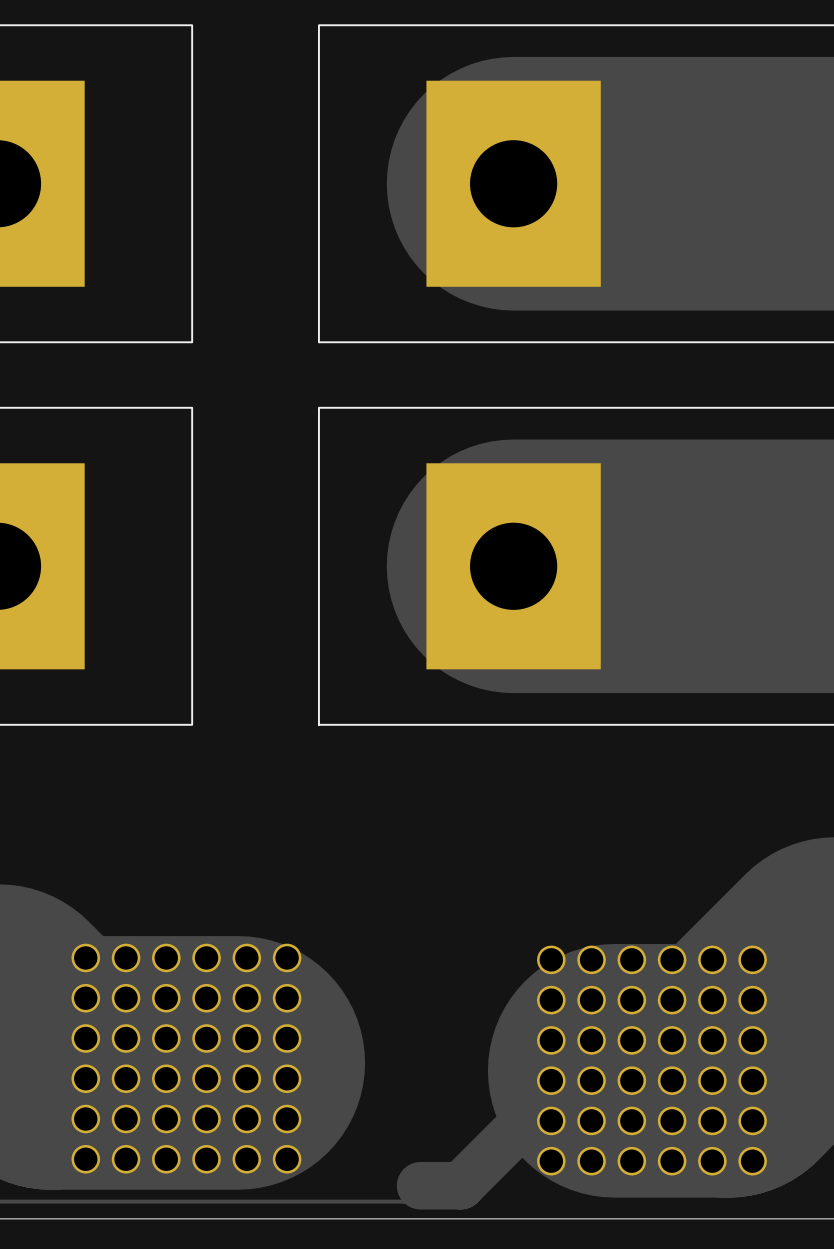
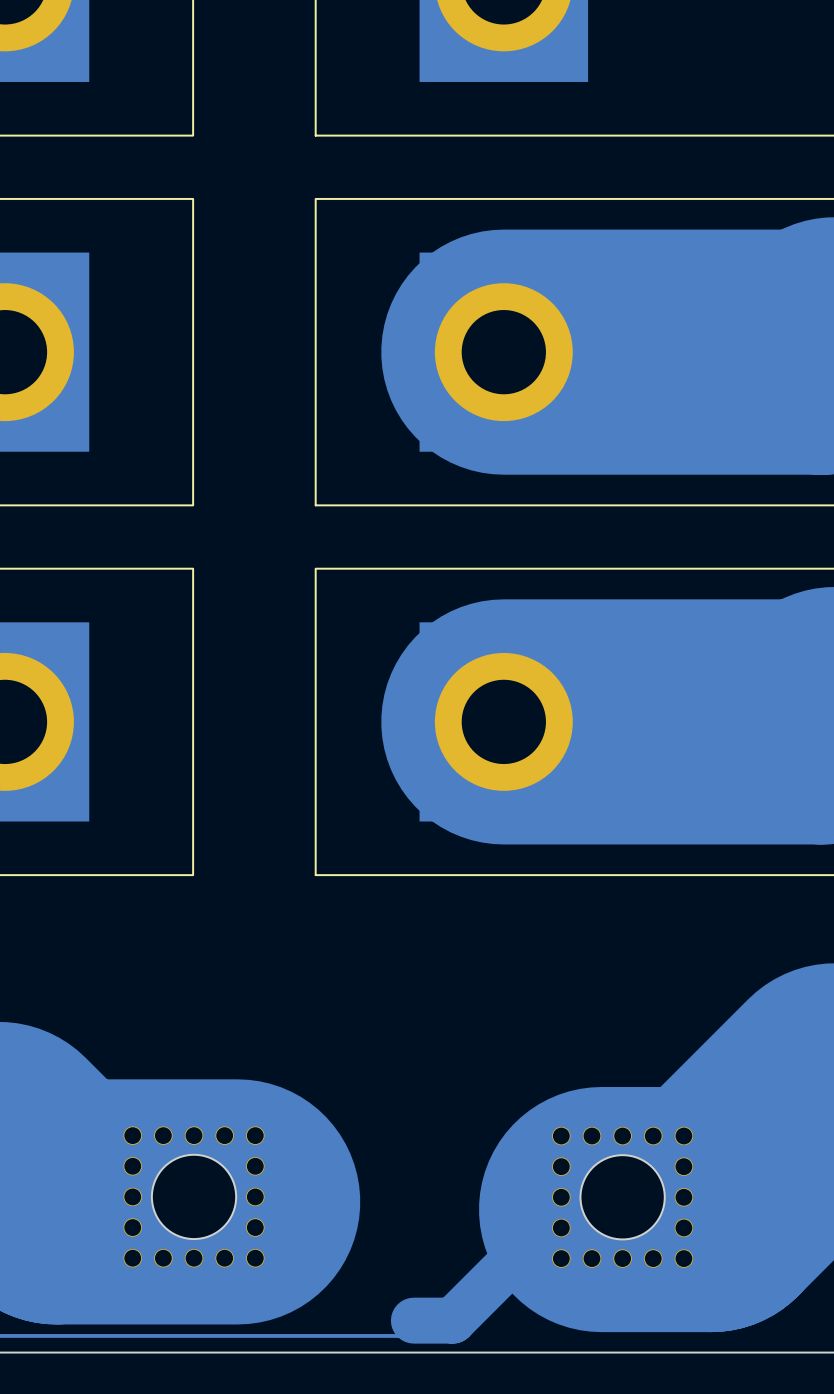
part footprint: [71, 943, 302, 1174] -> [123, 1126, 265, 1268]
part footprint: [537, 945, 767, 1176] -> [552, 1126, 694, 1268]

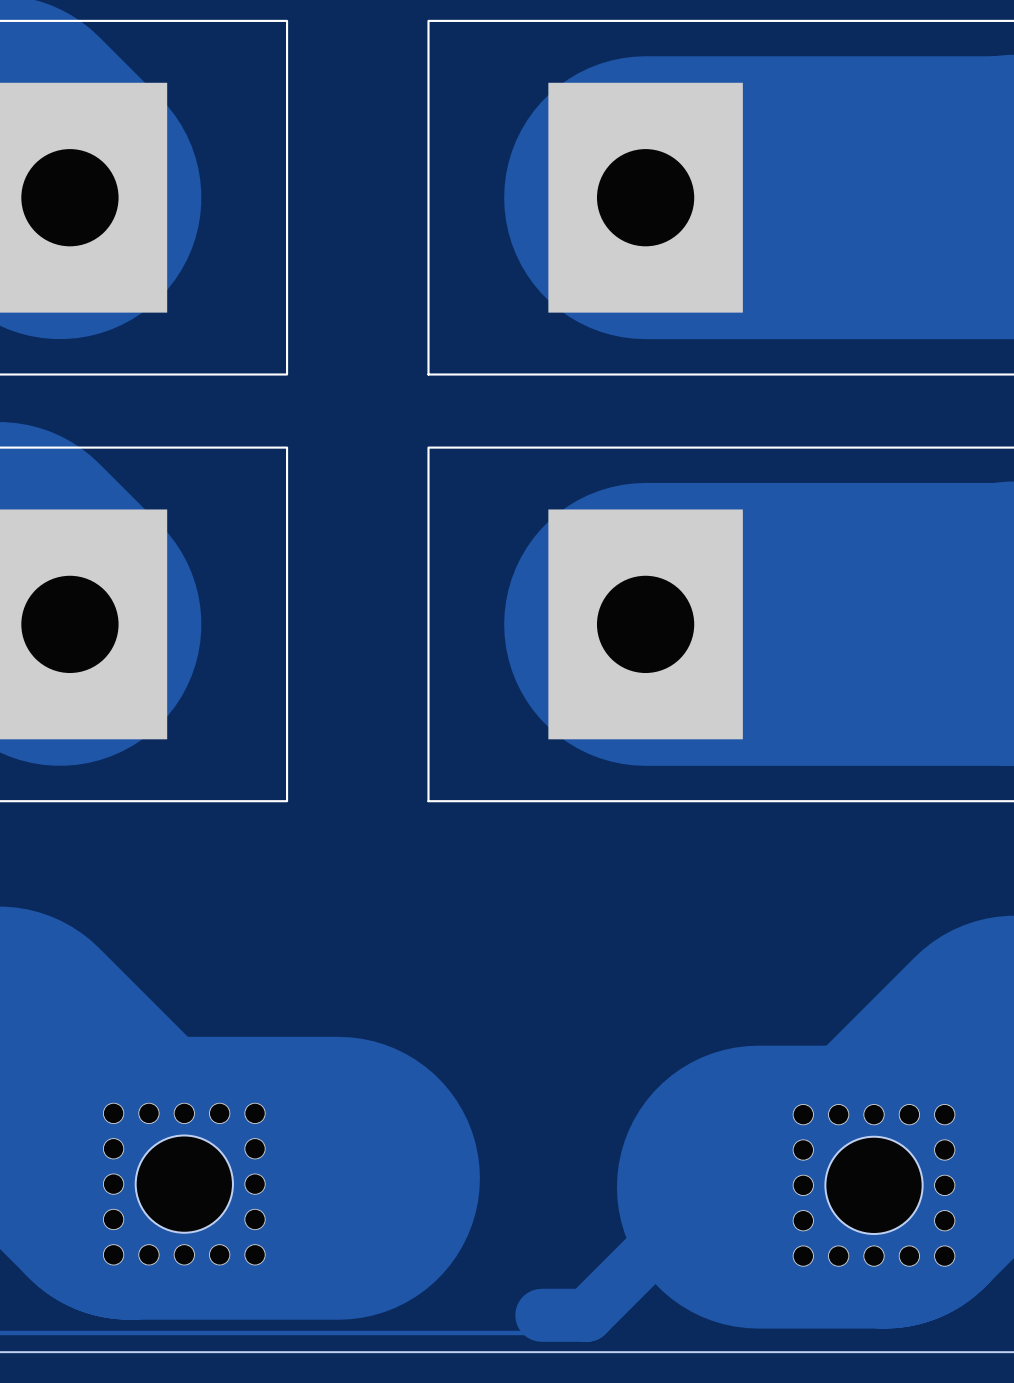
part position: (194, 1196) -> (184, 1184)
part position: (622, 1197) -> (874, 1185)

